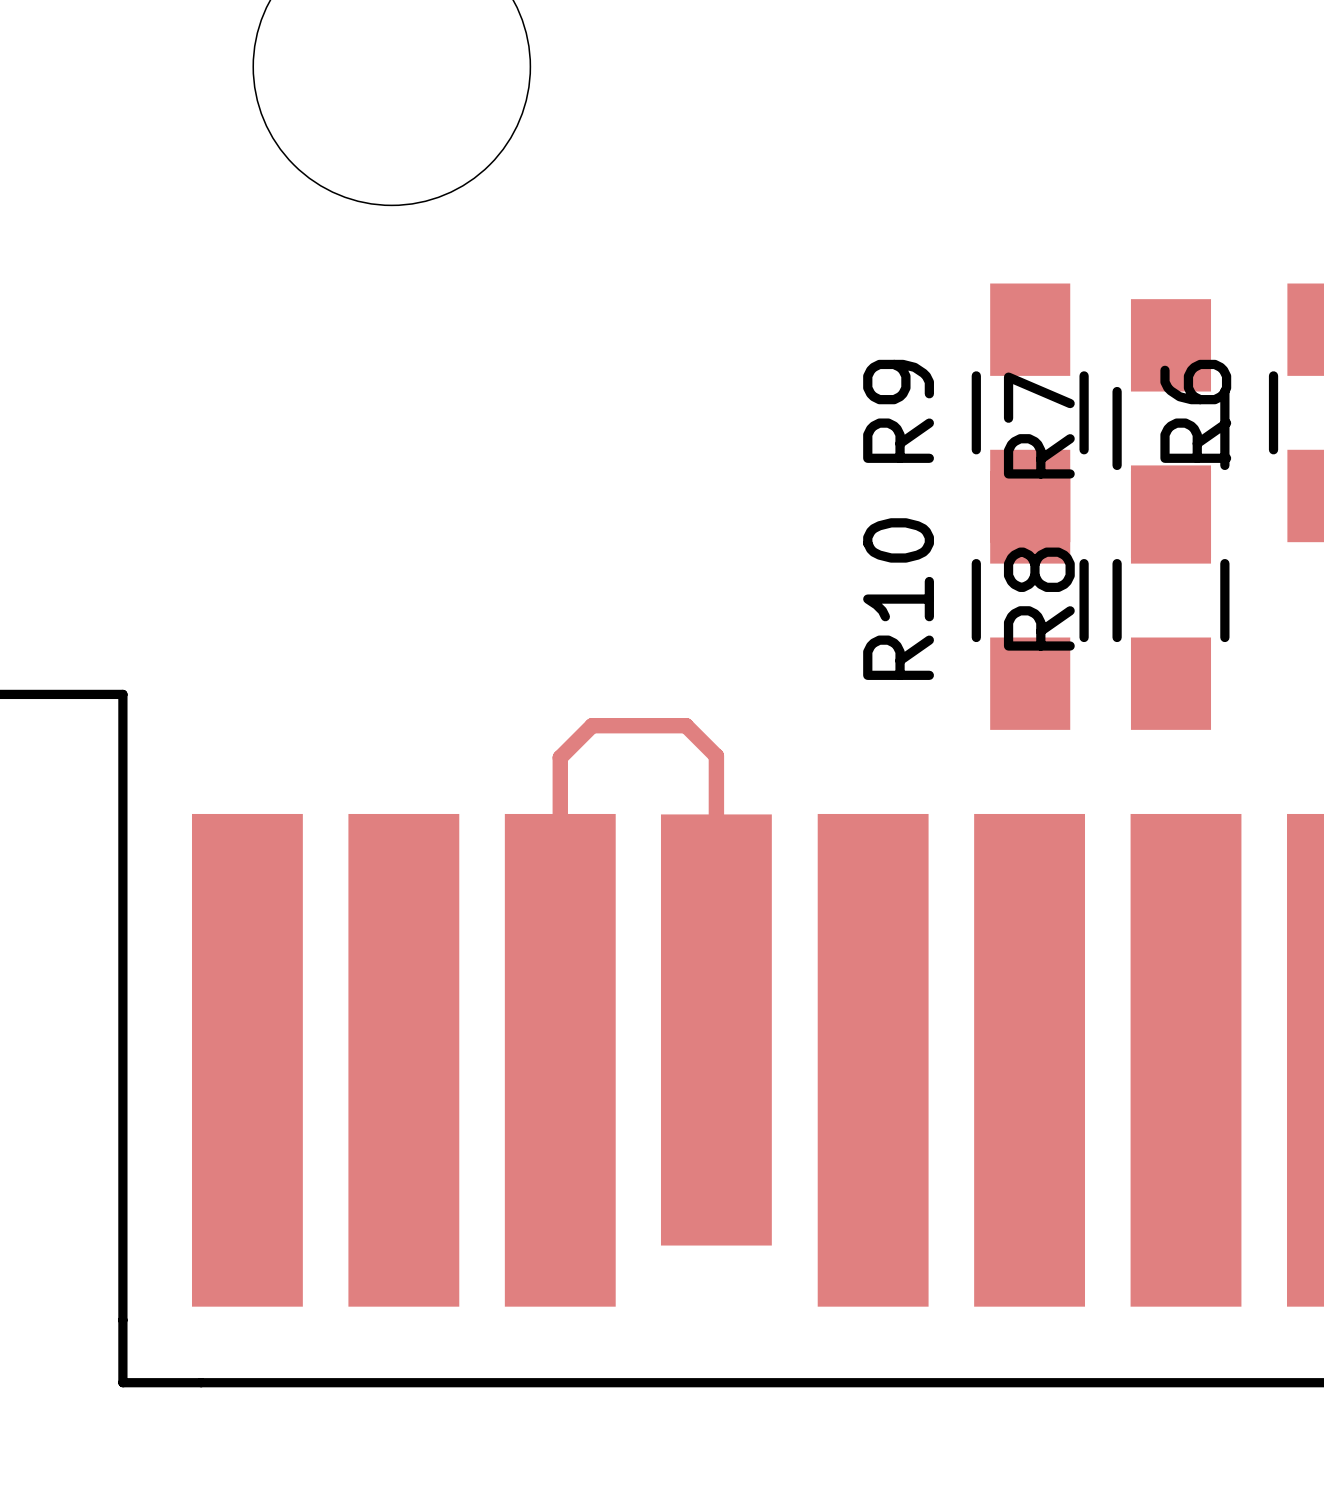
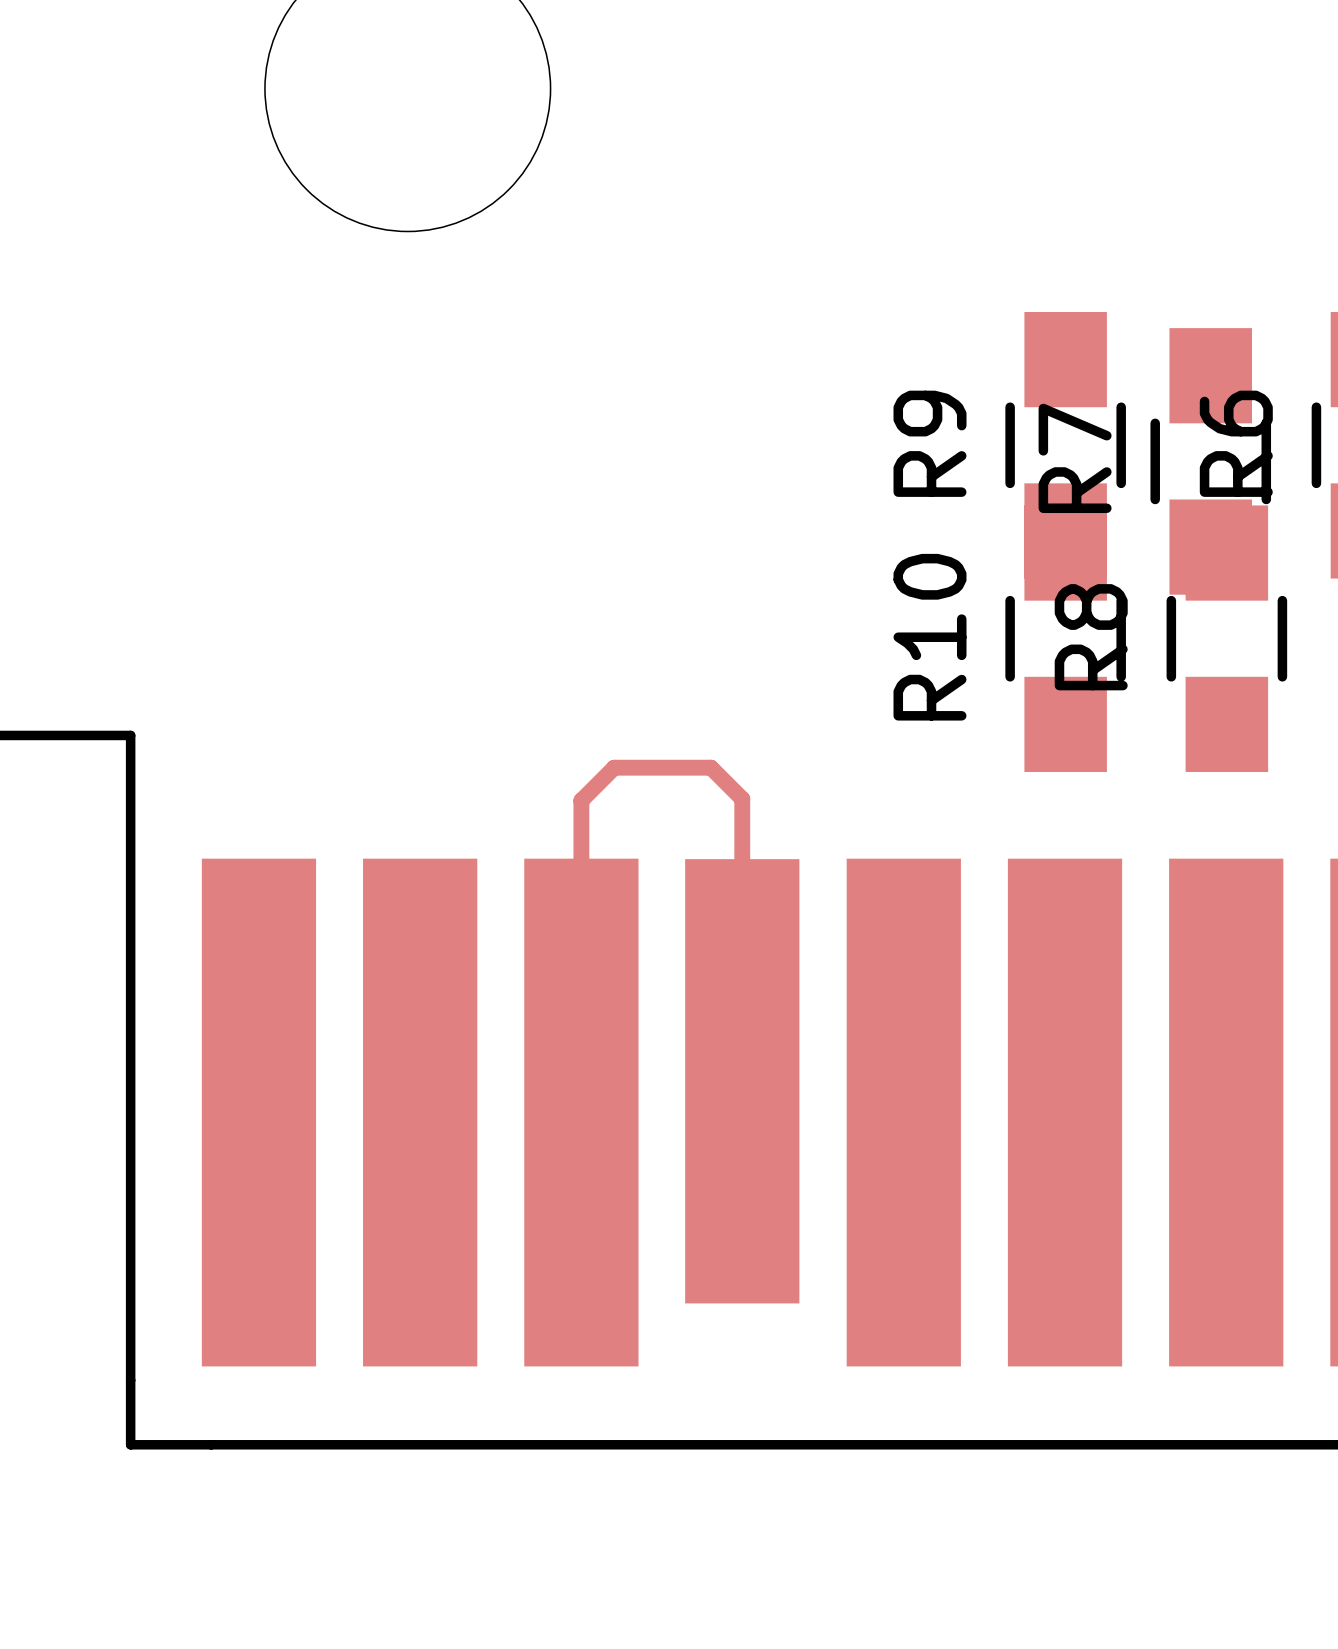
R8 position: (1170, 600) -> (1226, 638)

